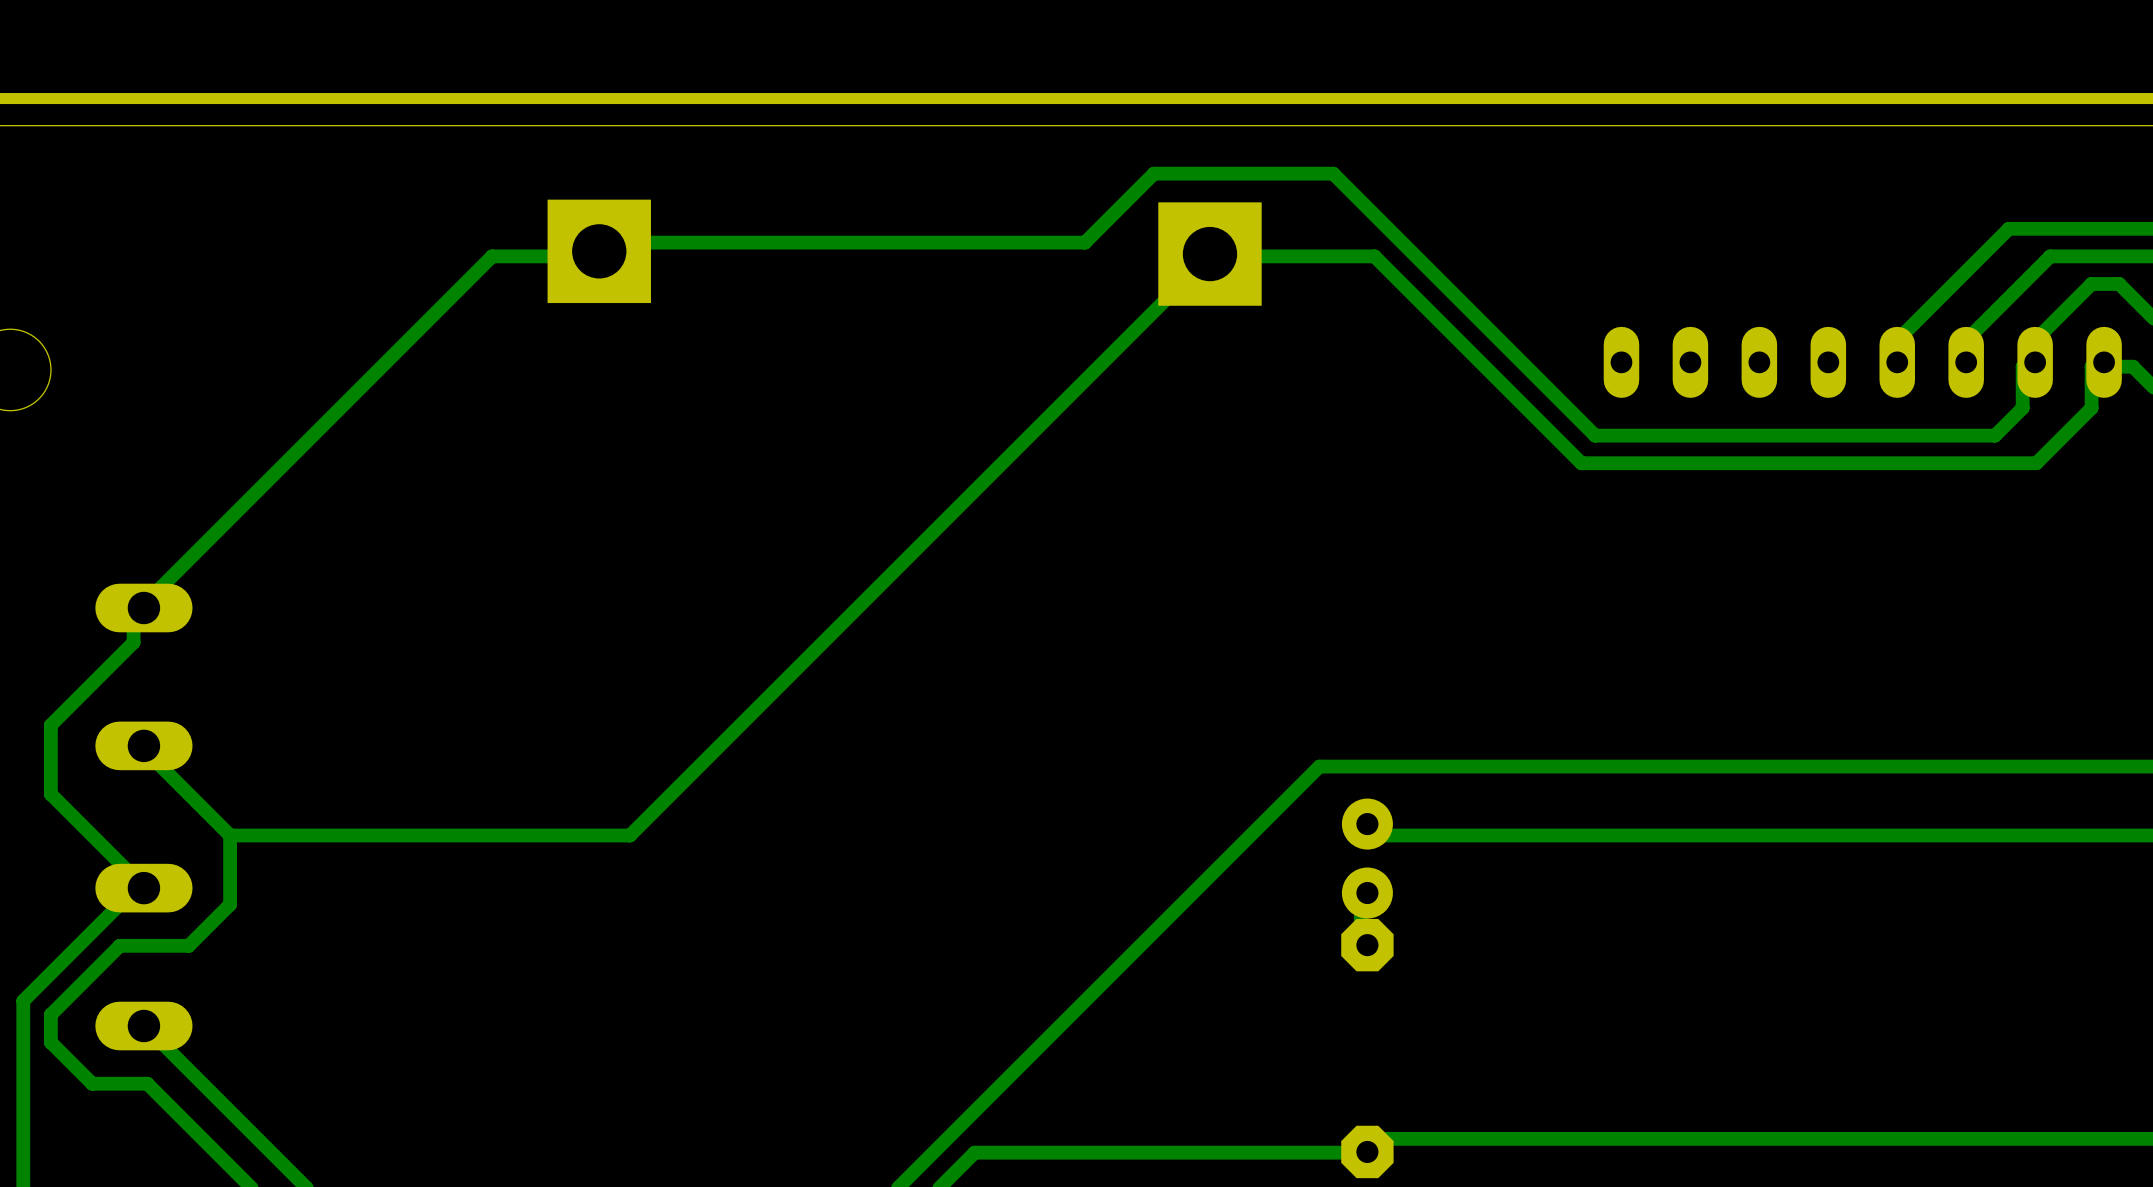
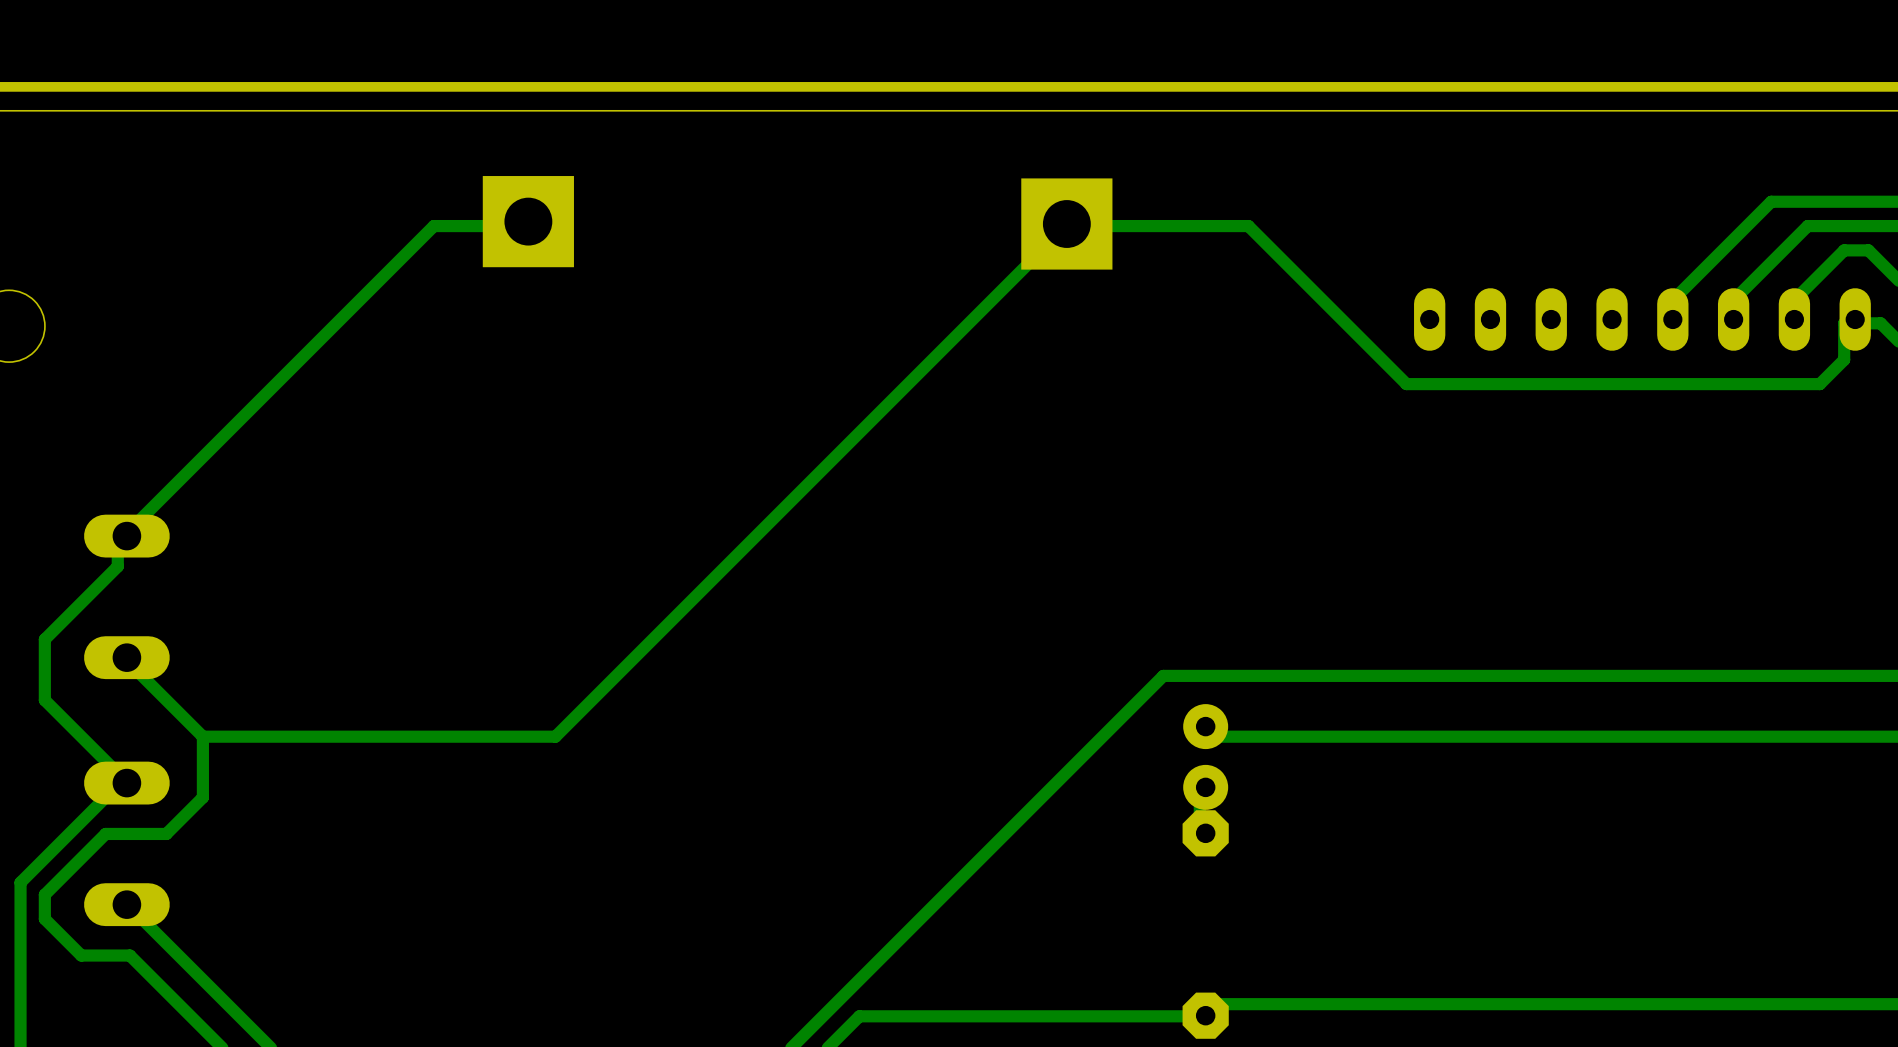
track: (599, 251) (602, 242) (1085, 242) (1153, 173) (1333, 173) (1415, 256) -> none
track: (1374, 256) (1581, 463) (2036, 463) (2064, 435) -> (1211, 226) (1248, 226)
track: (2035, 362) (2022, 366) (2022, 408) (1995, 435) -> (1819, 384) (1759, 384)

